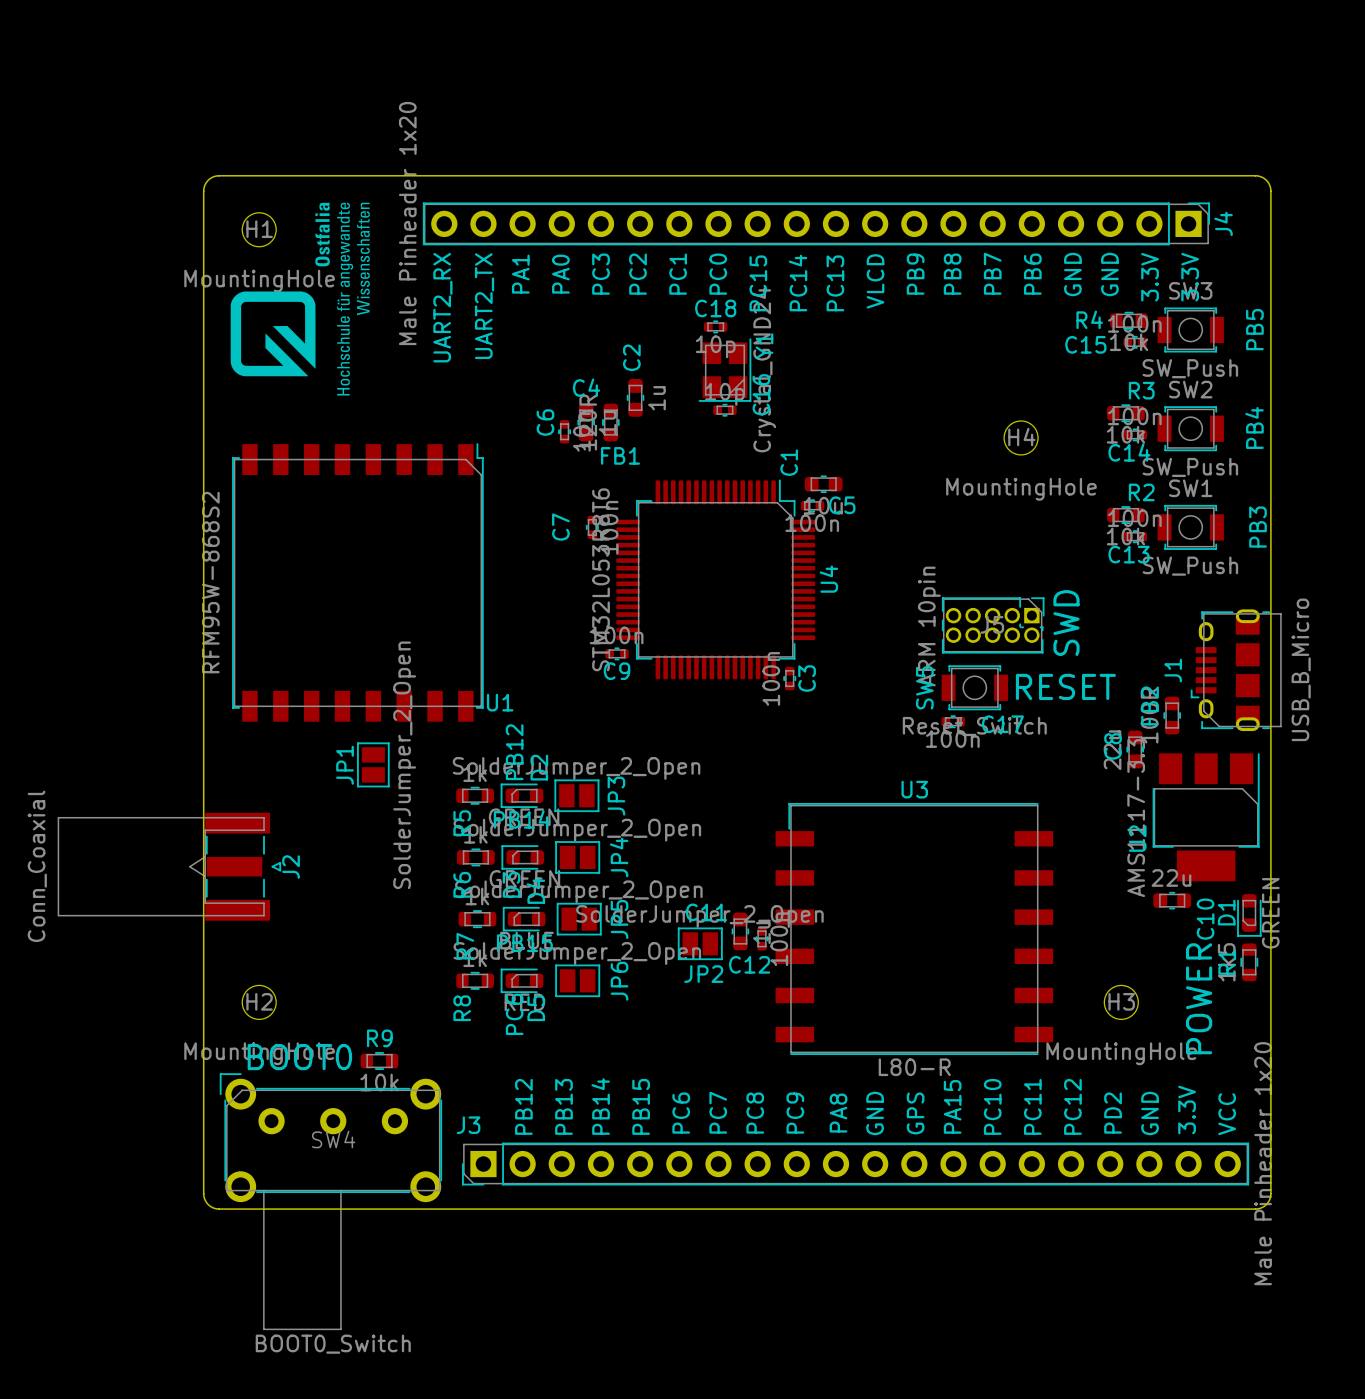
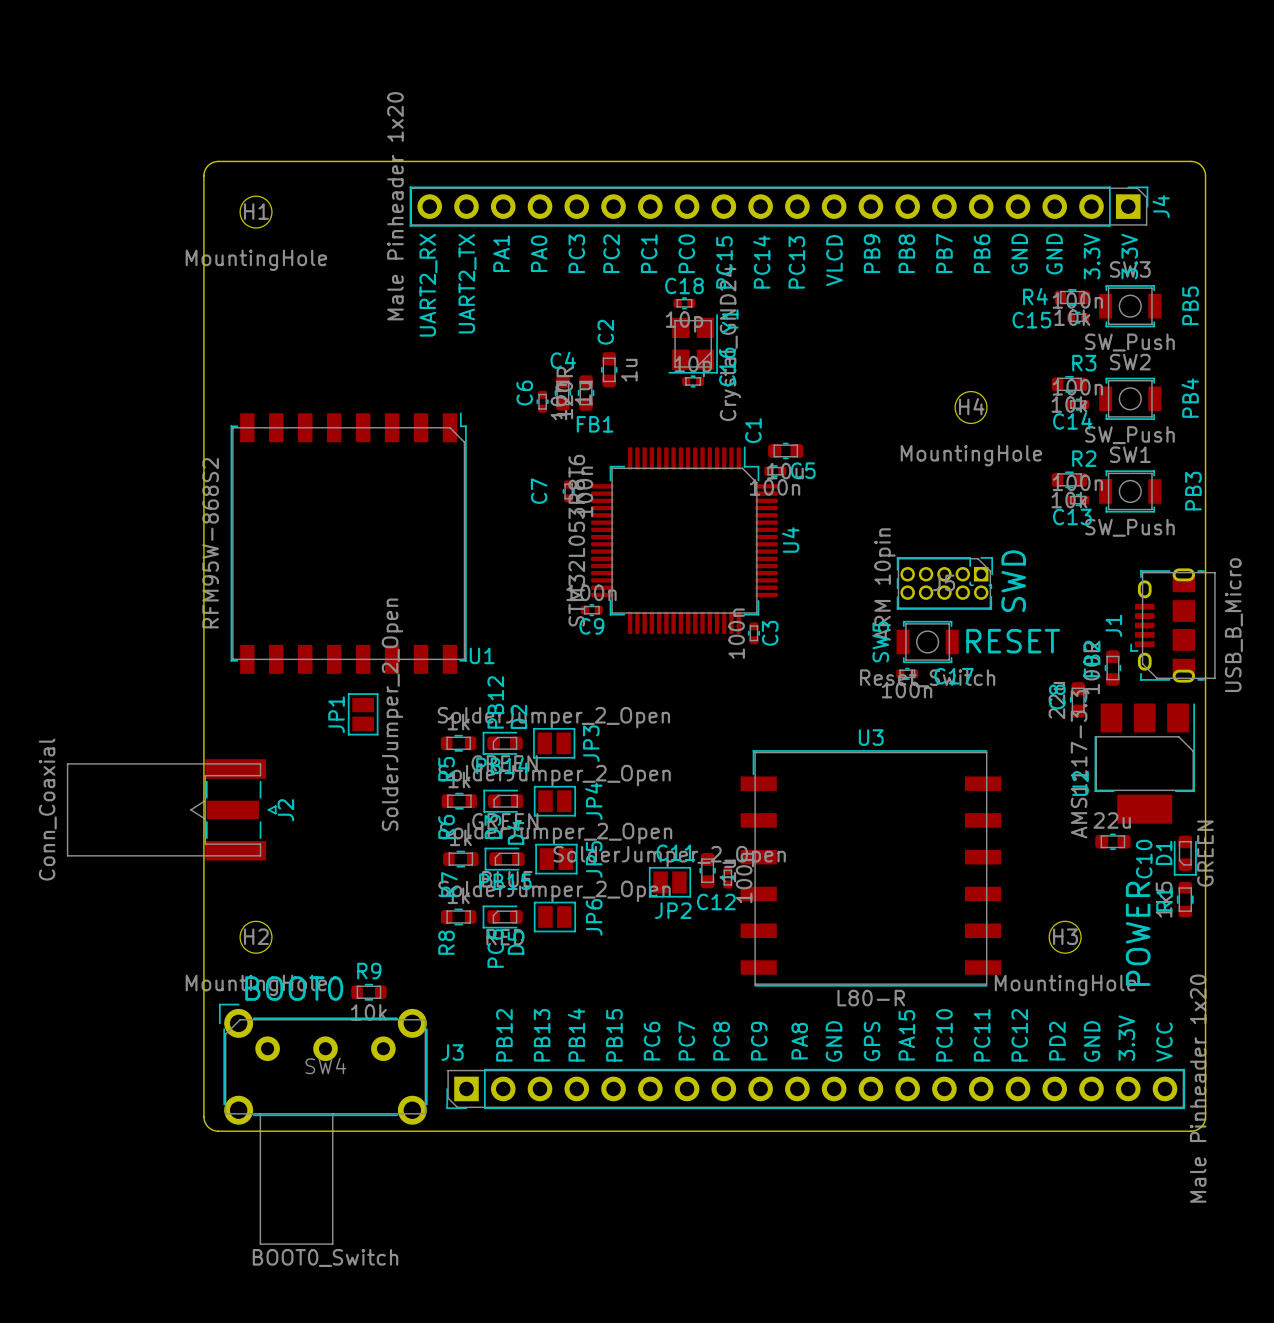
drawing: [230, 202, 370, 396] -> none

